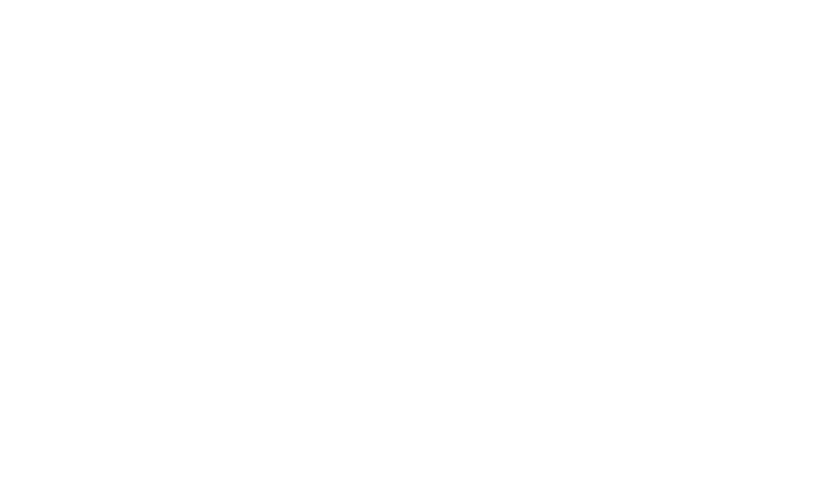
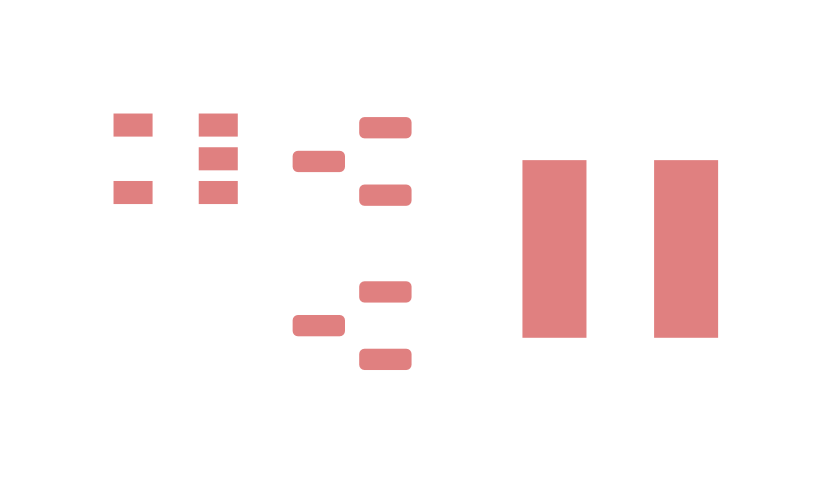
part: none -> (175, 158)
part: none -> (352, 161)
part: none -> (620, 248)
part: none -> (352, 325)

